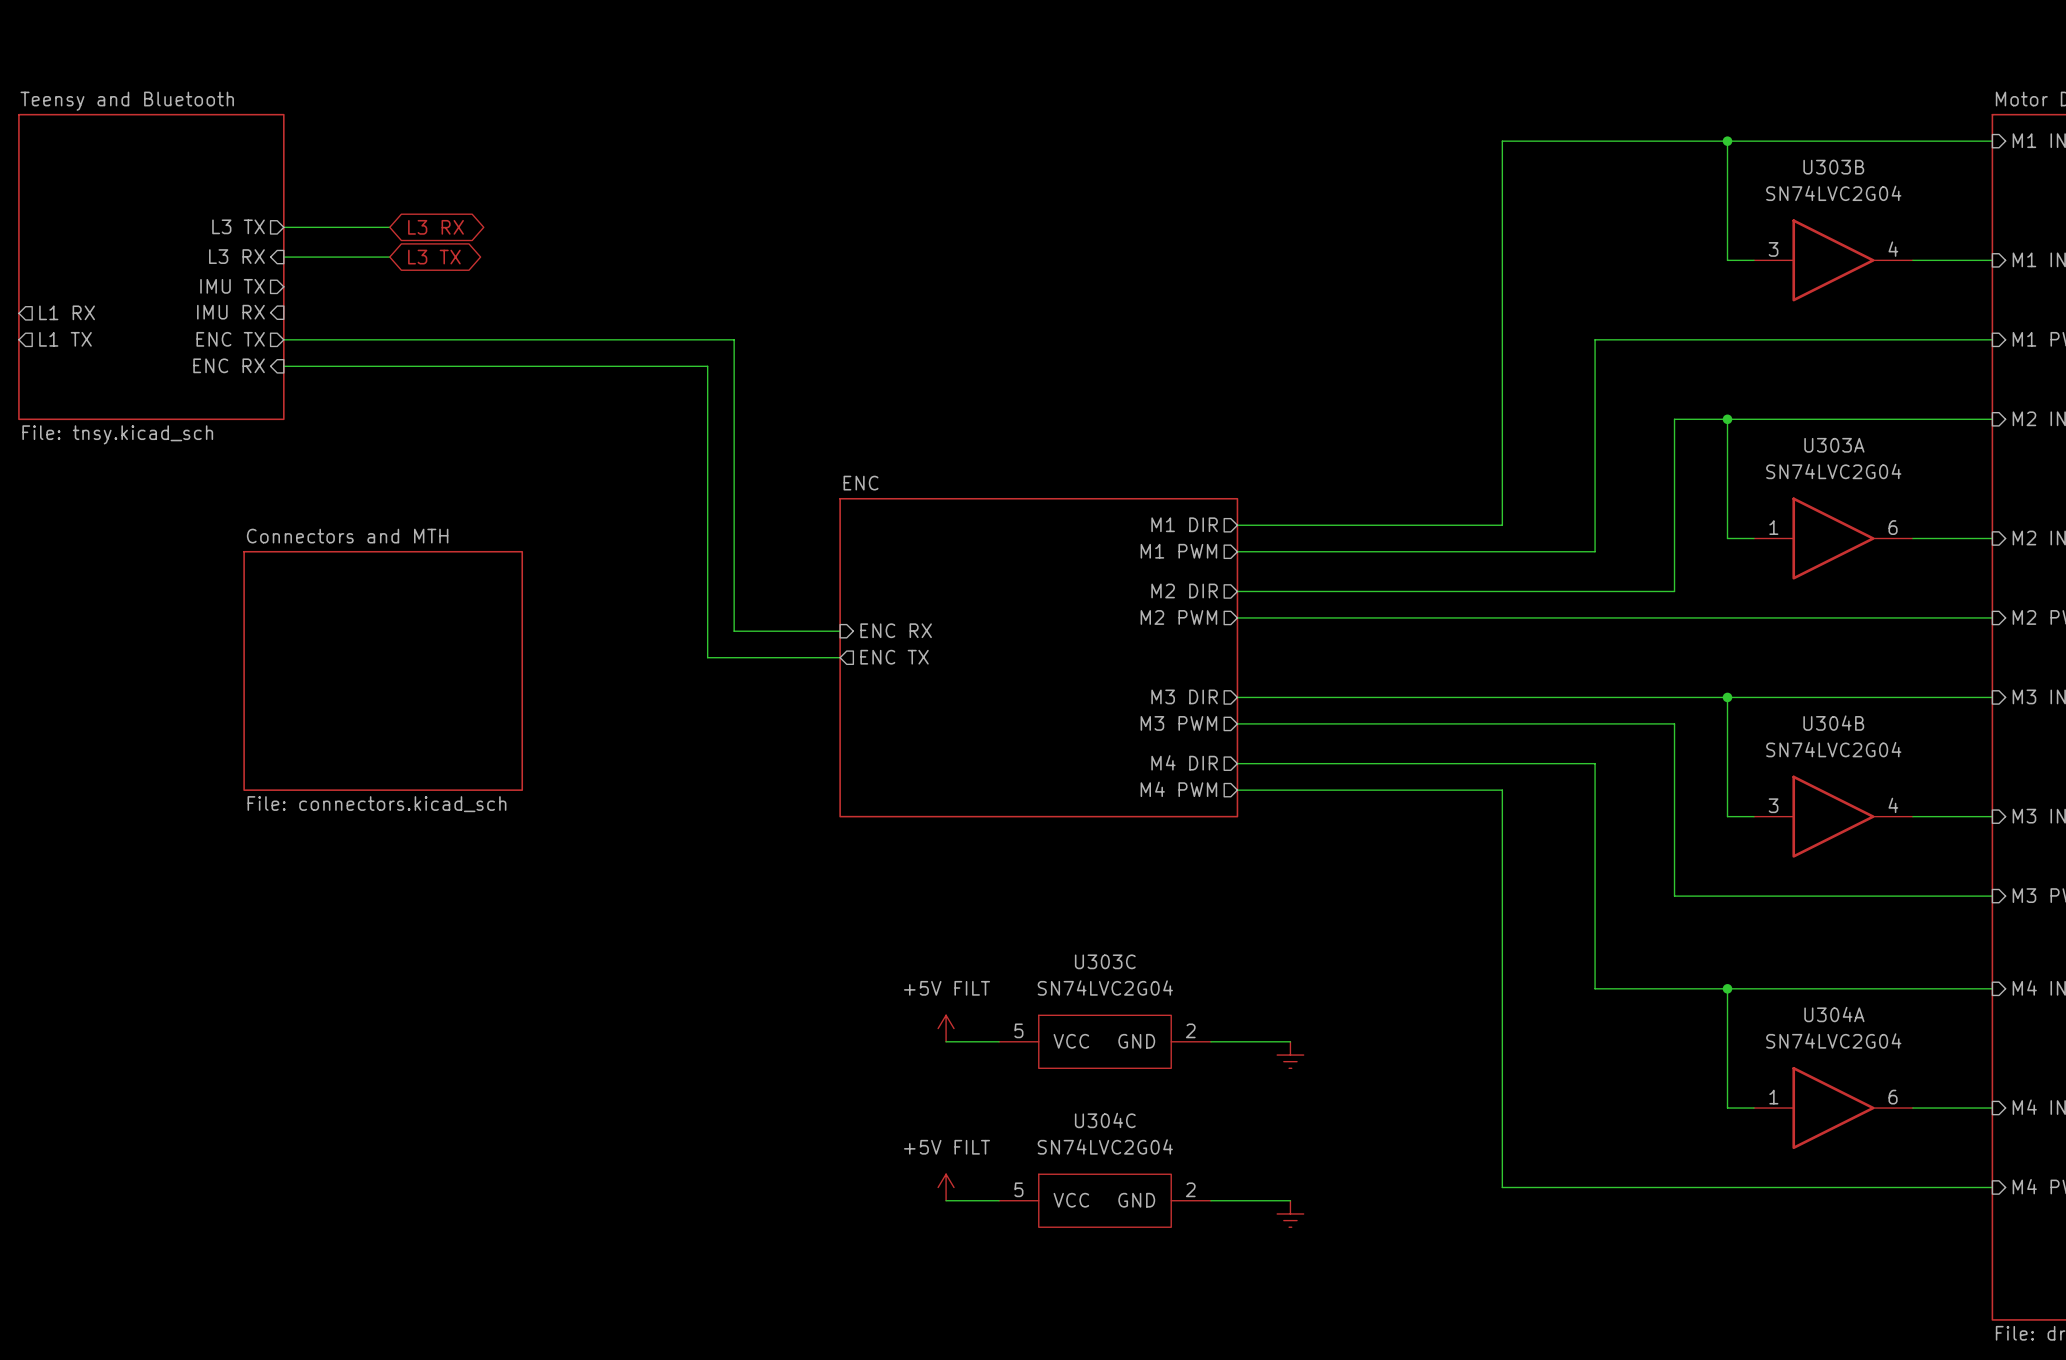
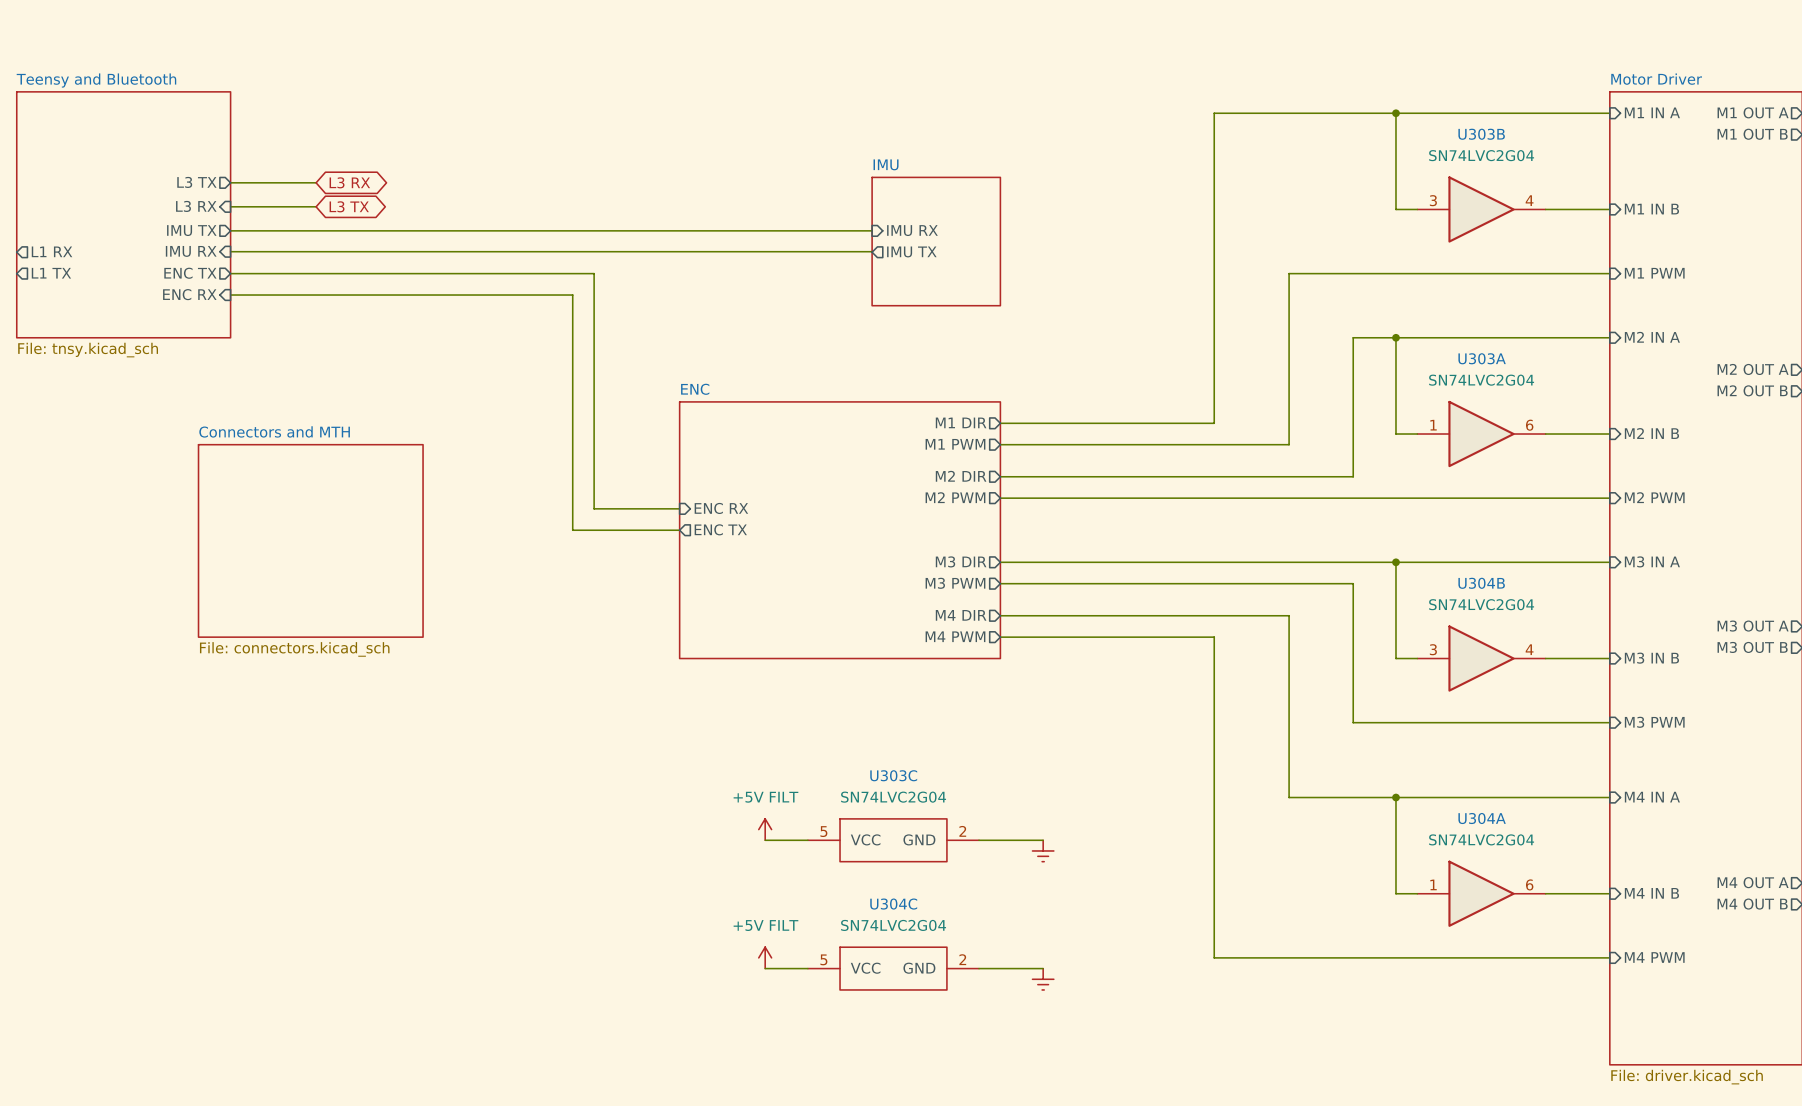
wire: none -> (230, 230) (872, 230)
sheet pin: none -> IMU RX (912, 230)
sheet IMU: none -> (936, 241)
wire: none -> (230, 251) (872, 252)
sheet pin: none -> IMU TX (911, 251)

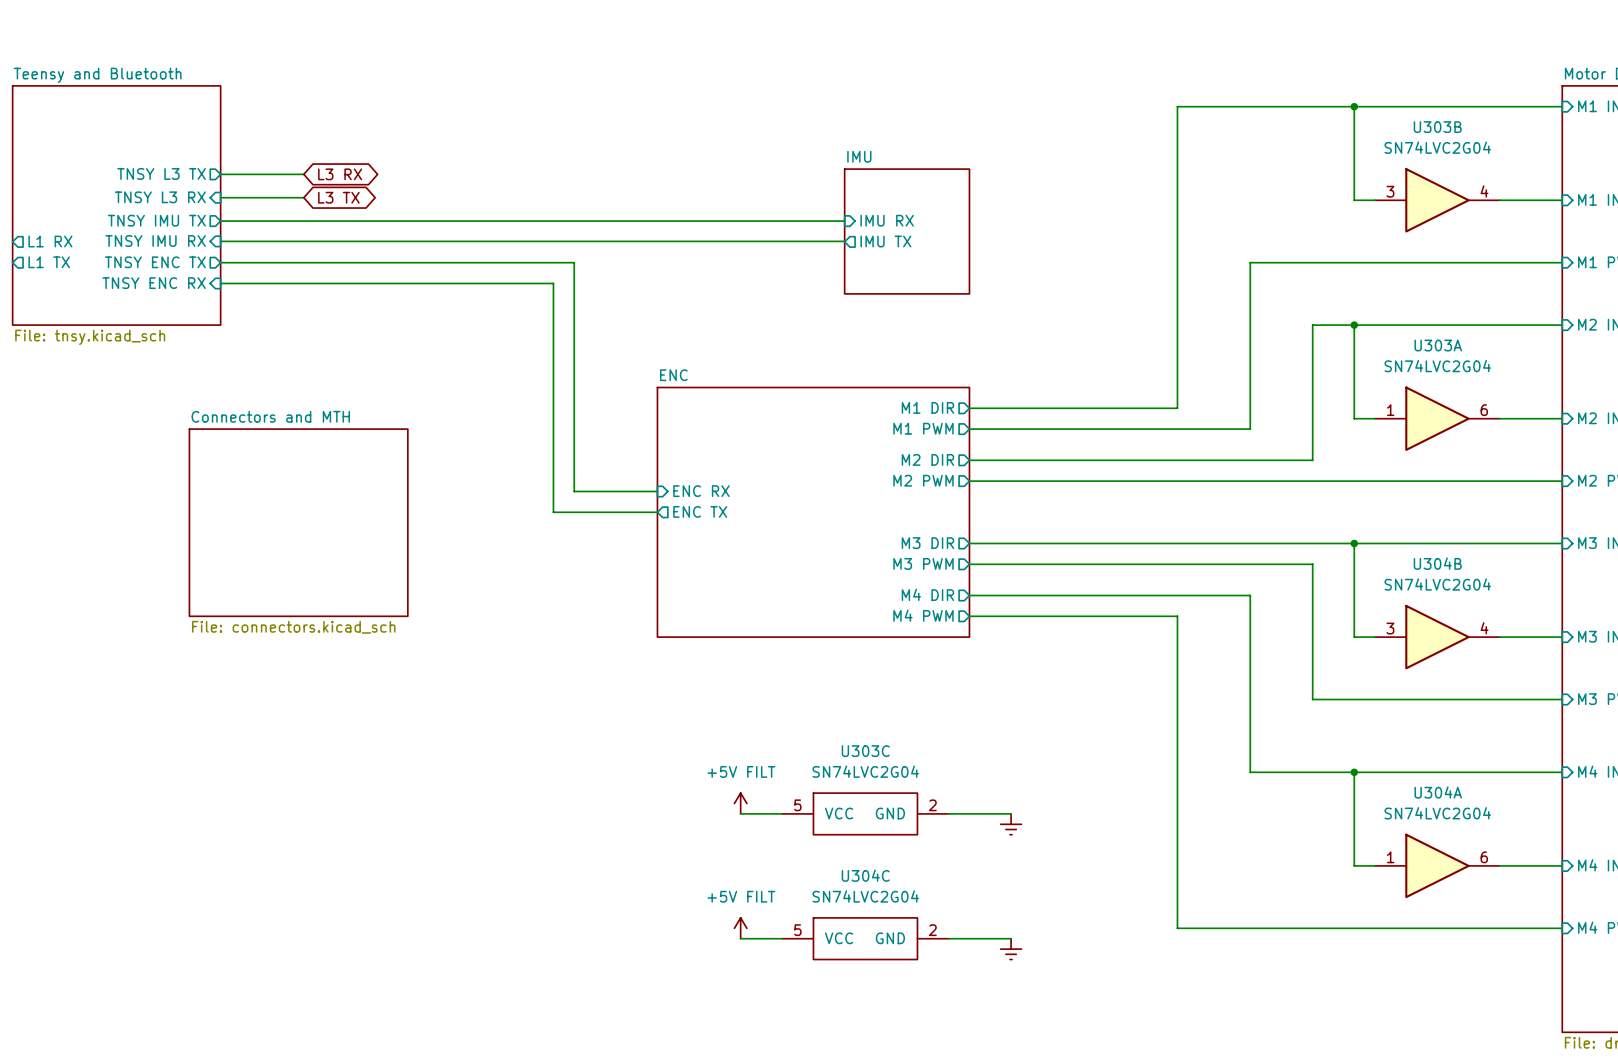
sheet pin: L3 TX (196, 182) -> TNSY L3 TX (161, 173)
sheet pin: L3 RX (196, 206) -> TNSY L3 RX (160, 197)
sheet pin: IMU TX (191, 230) -> TNSY IMU TX (156, 220)
sheet pin: IMU RX (191, 251) -> TNSY IMU RX (155, 240)
sheet pin: ENC TX (190, 273) -> TNSY ENC TX (155, 262)
sheet pin: ENC RX (189, 294) -> TNSY ENC RX (154, 283)

